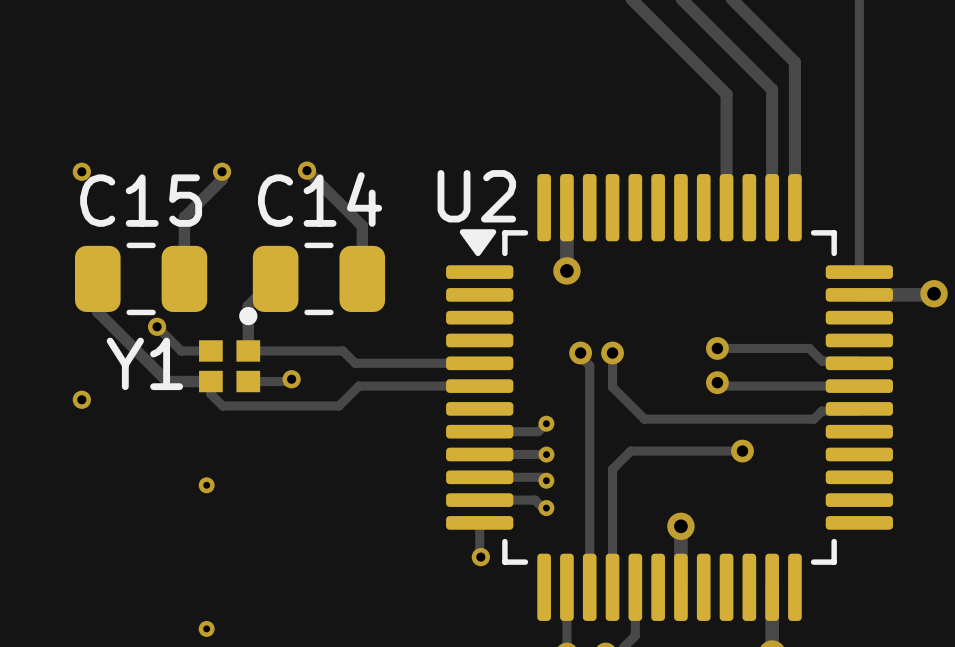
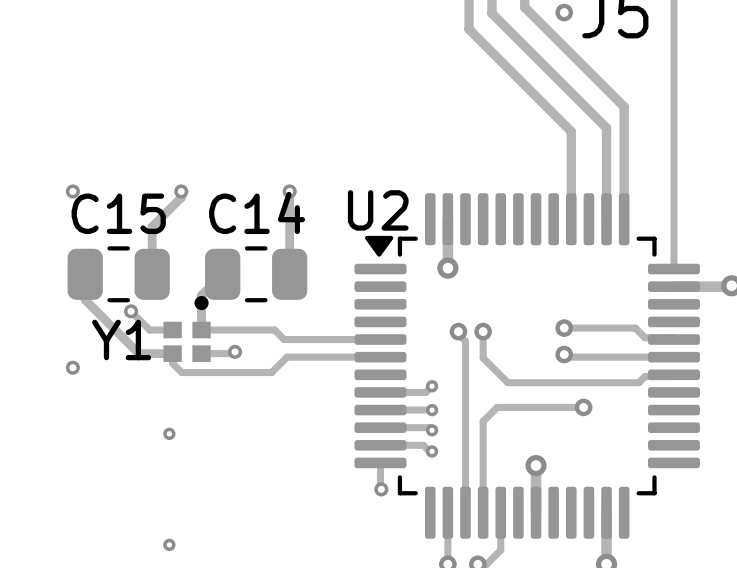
track: (307, 170) (362, 225) -> (289, 191) (289, 233)
via position: (307, 170) -> (289, 191)

